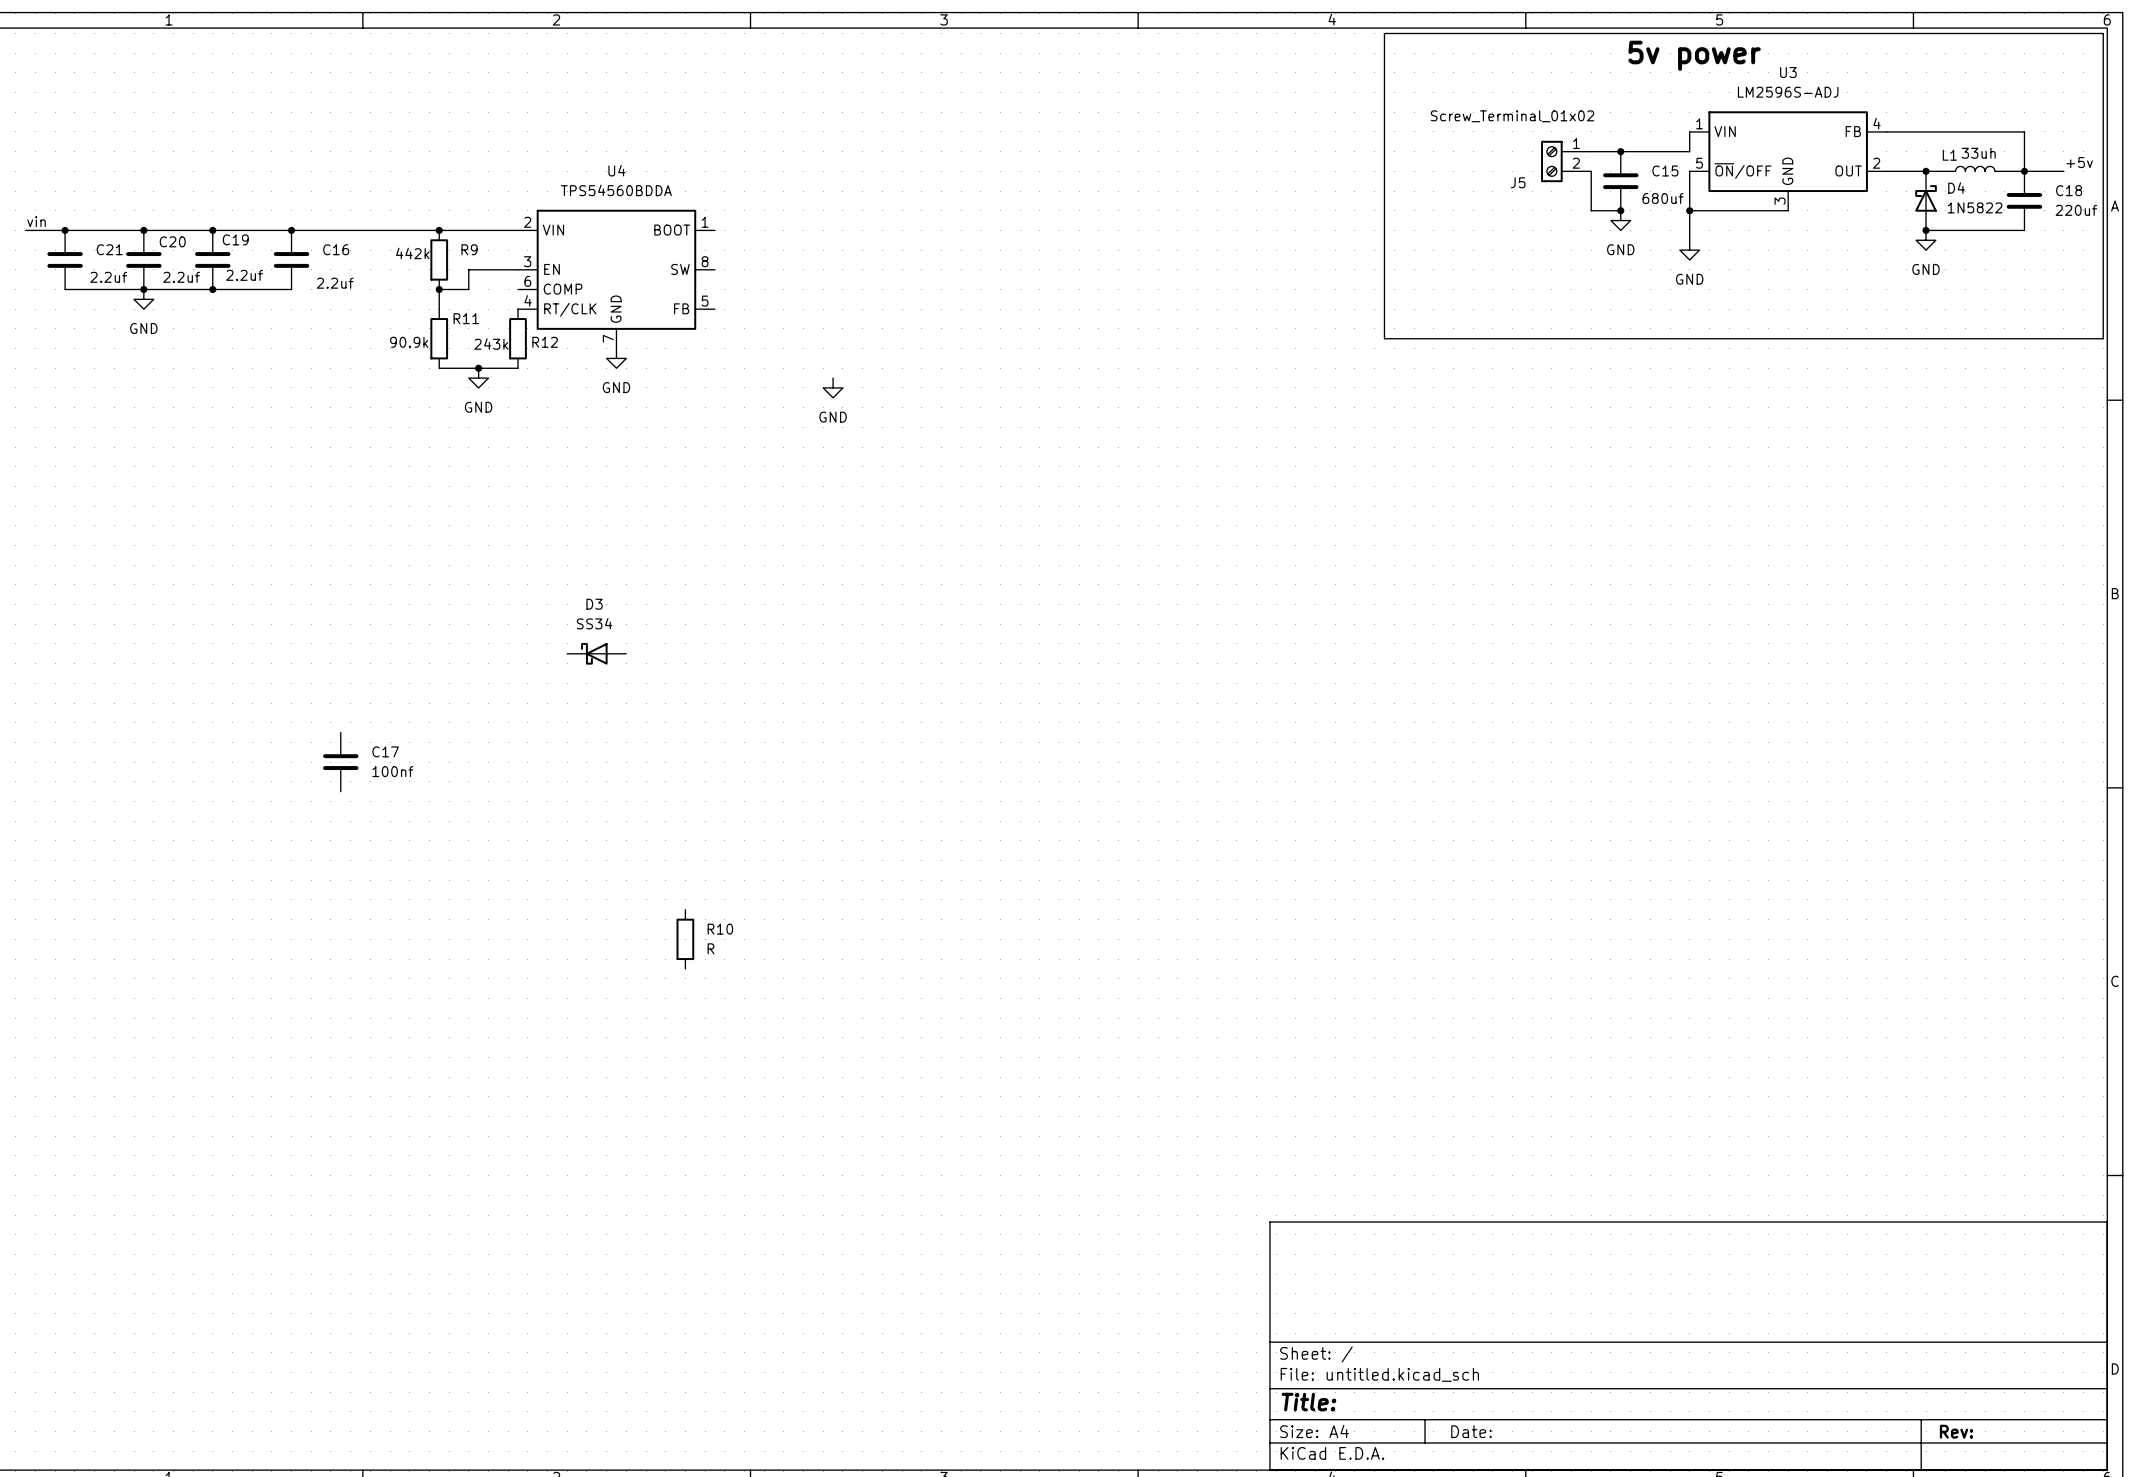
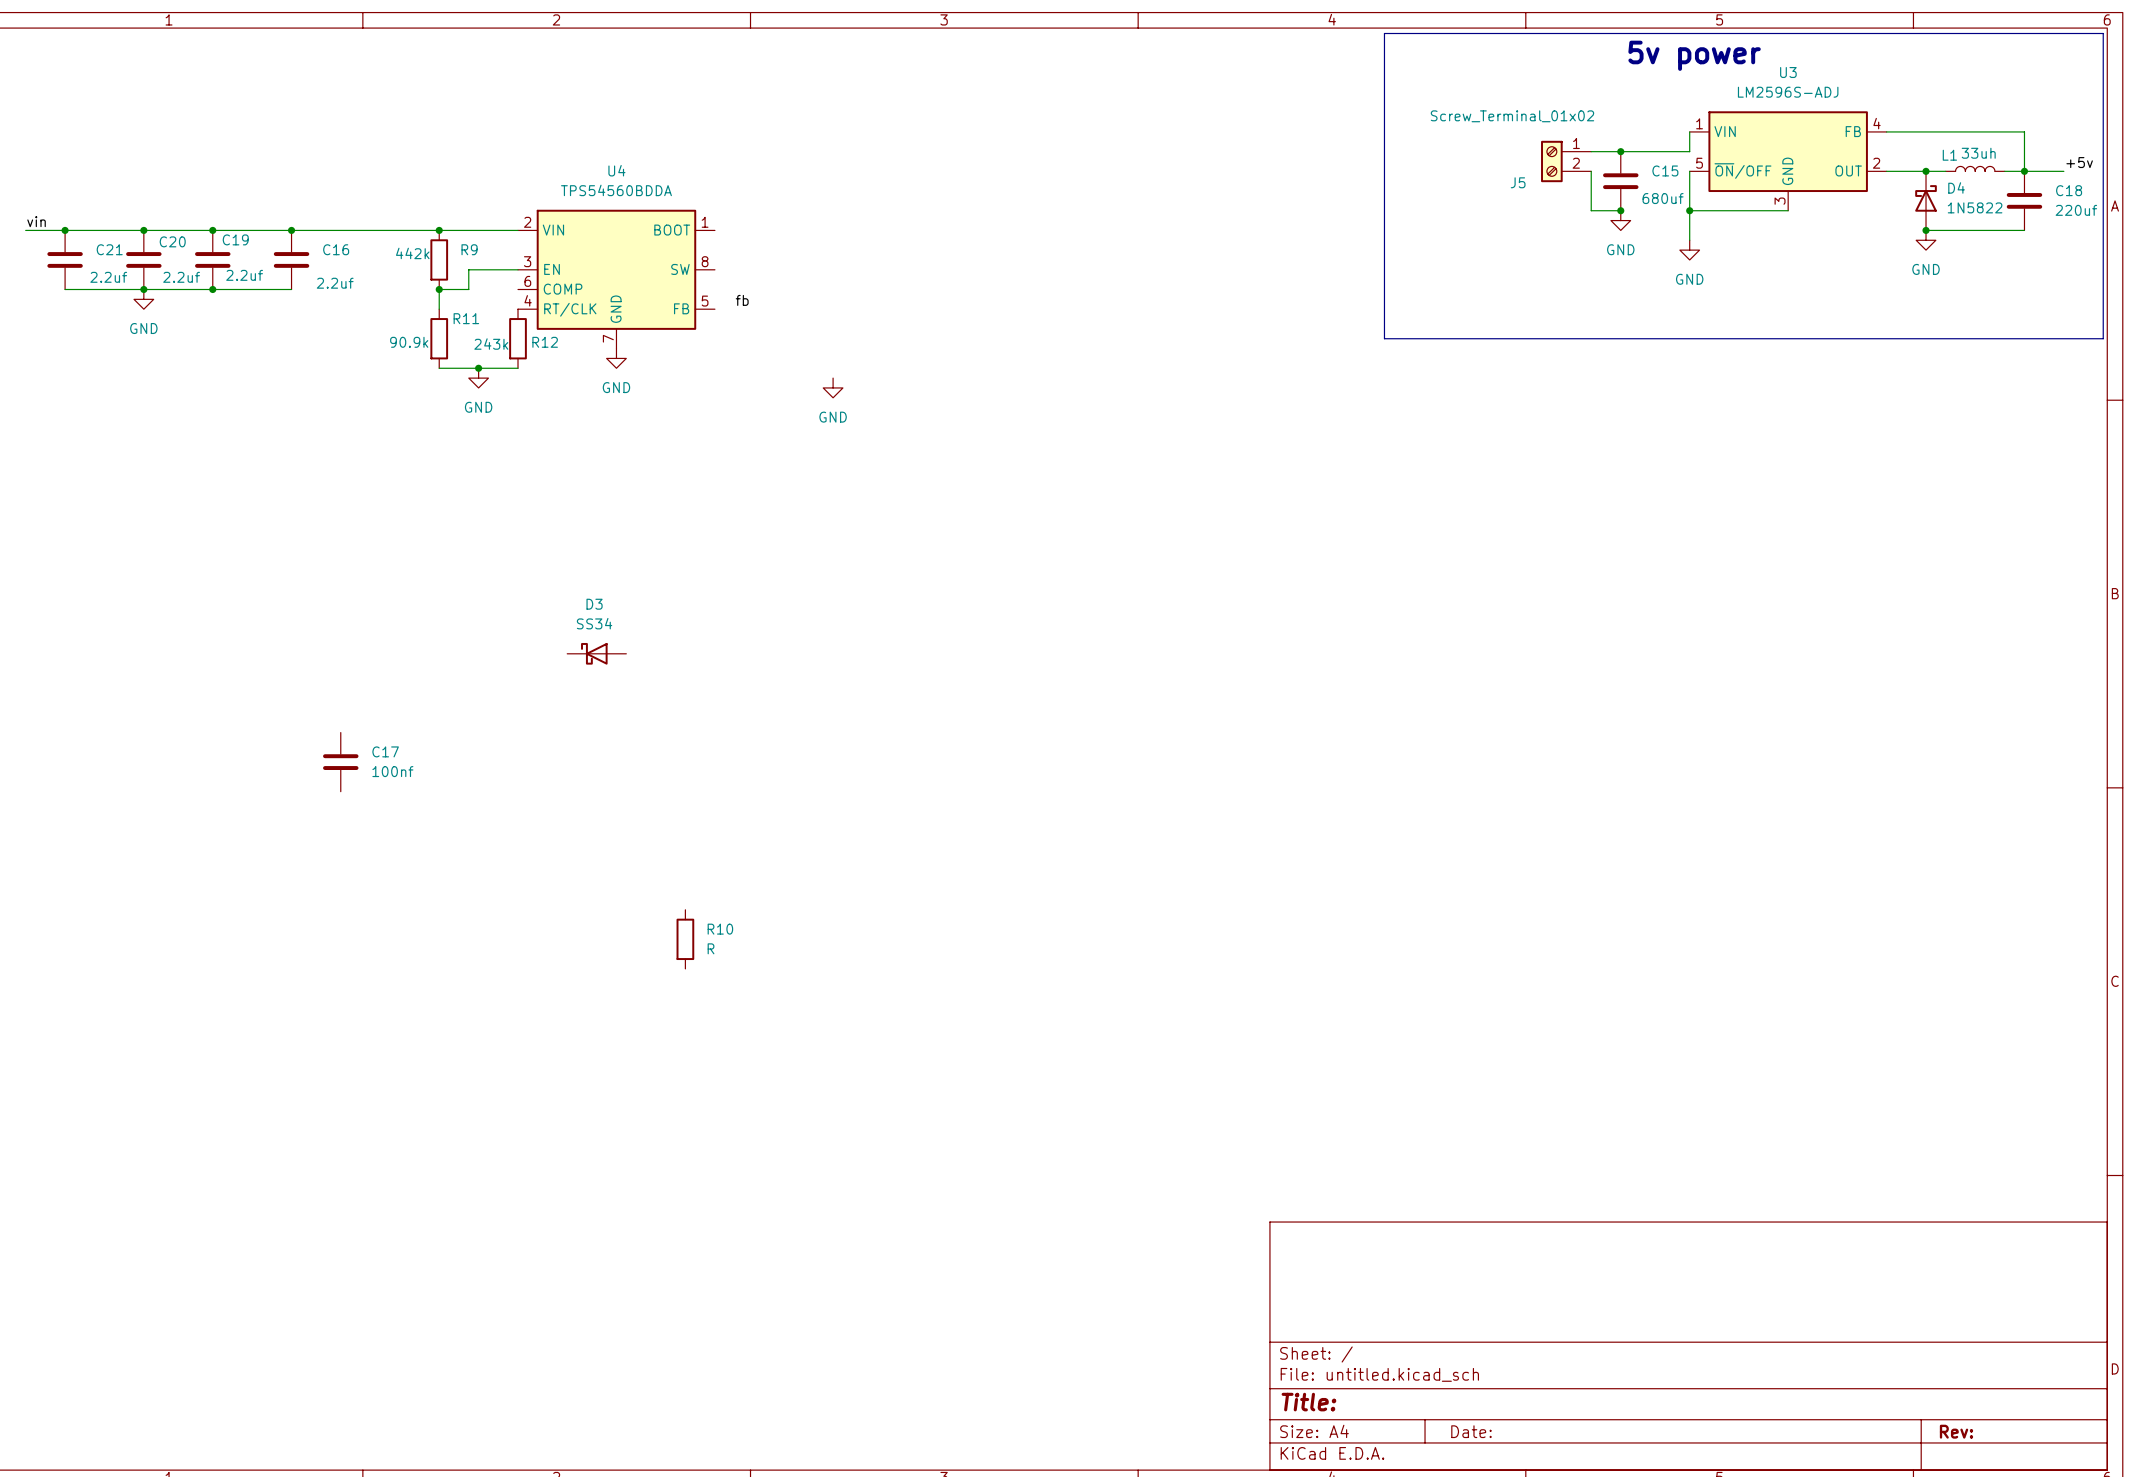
label: none -> fb (742, 300)

